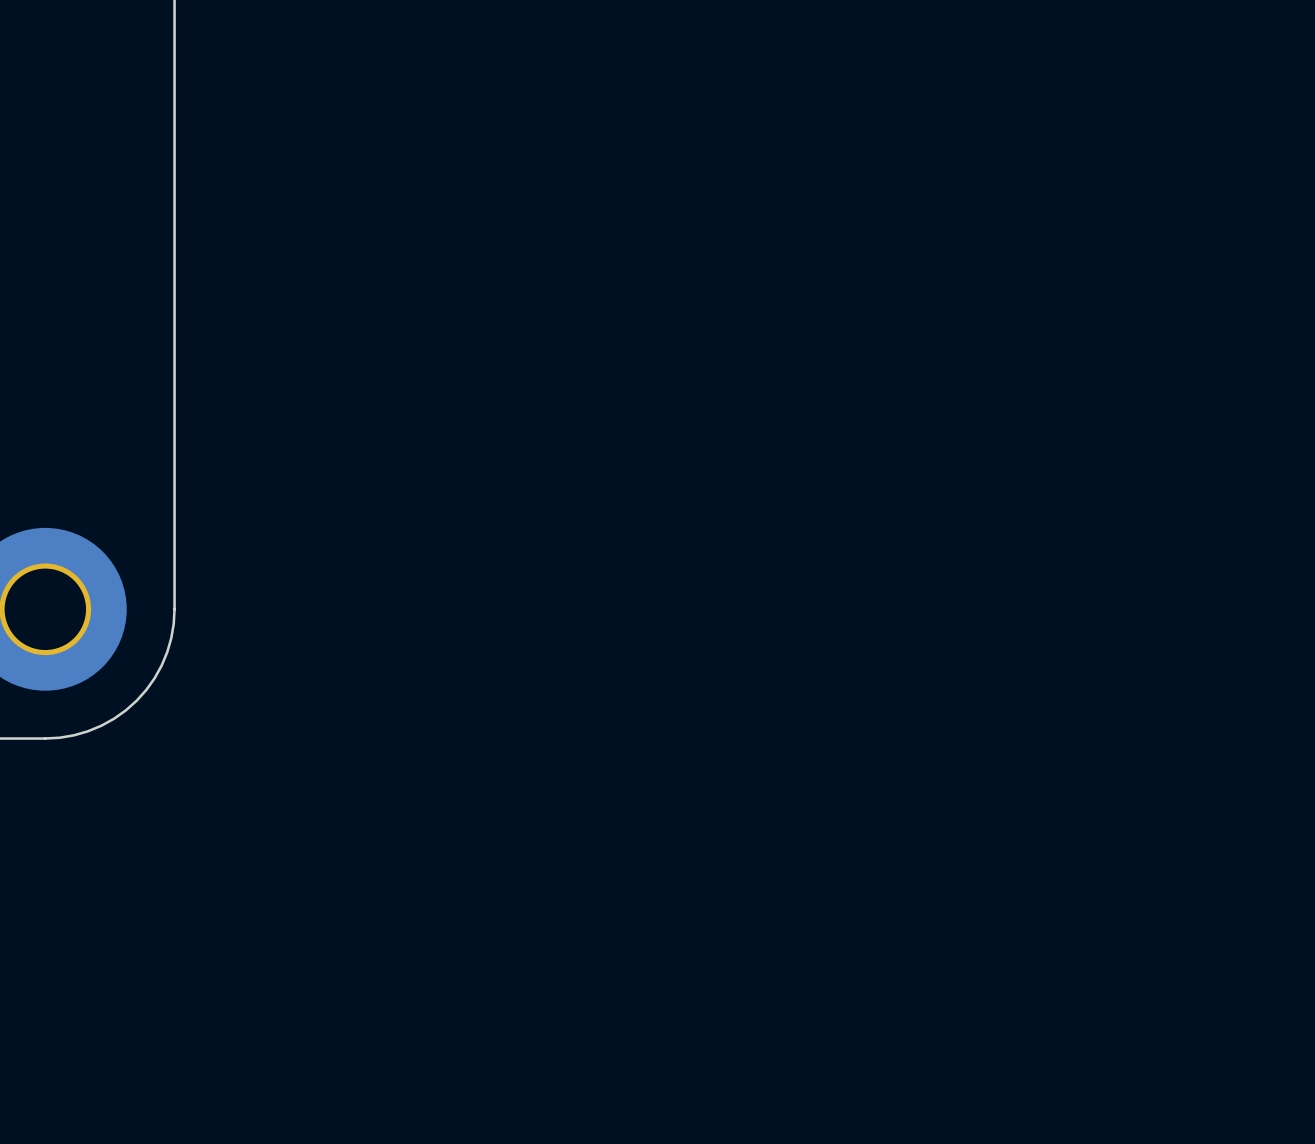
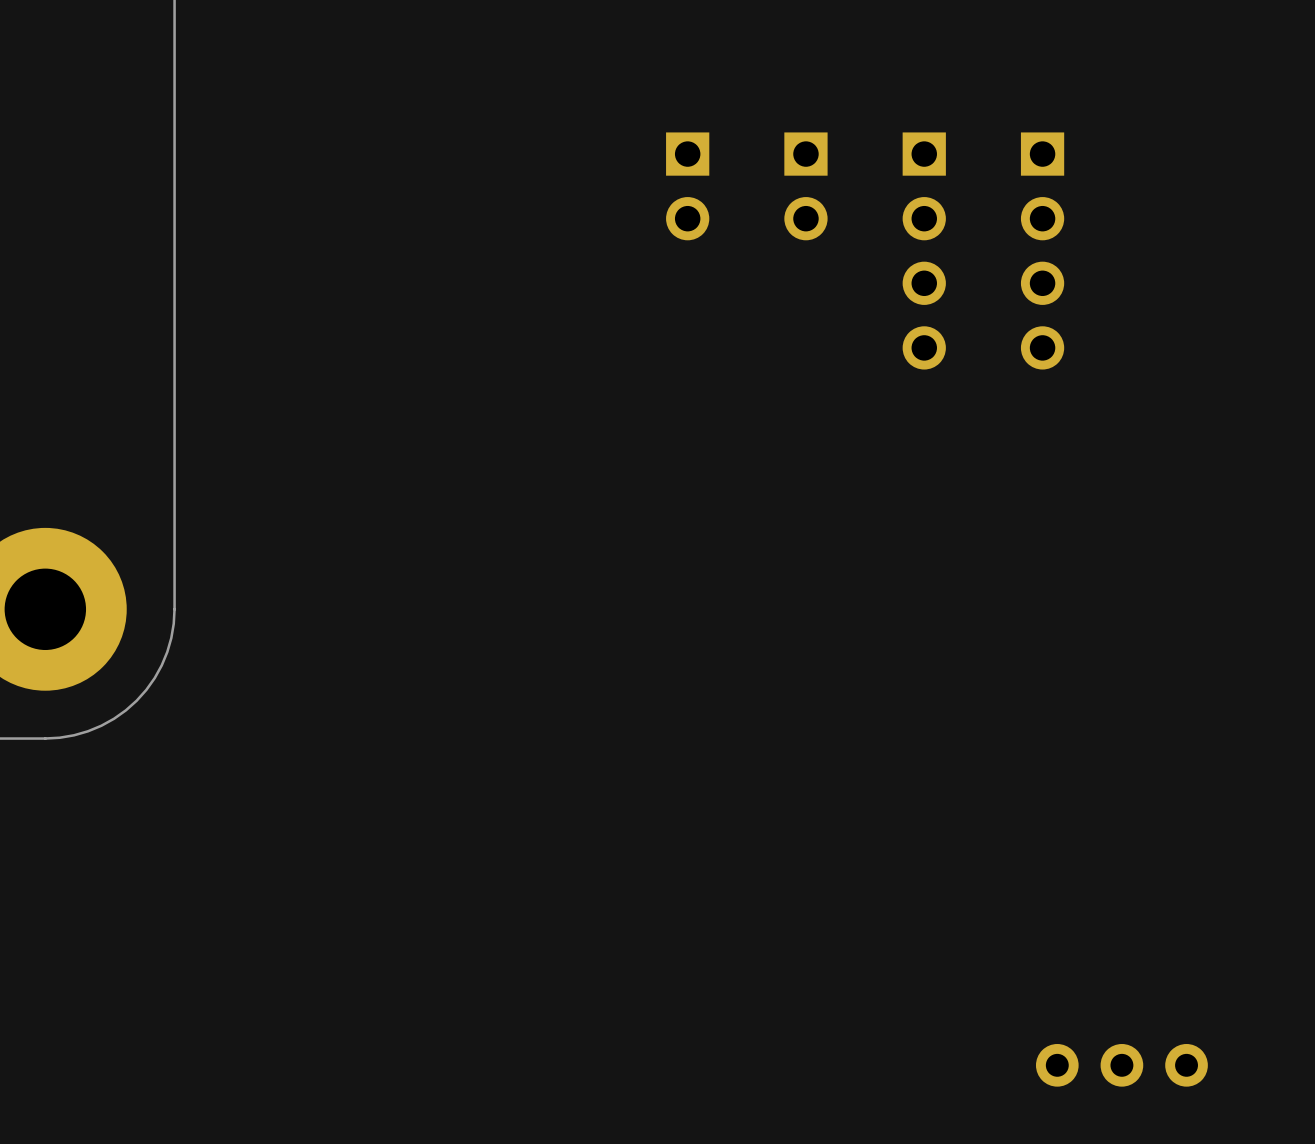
part: none -> (687, 186)
part: none -> (805, 186)
part: none -> (924, 250)
part: none -> (1042, 250)
part: none -> (1121, 1065)

